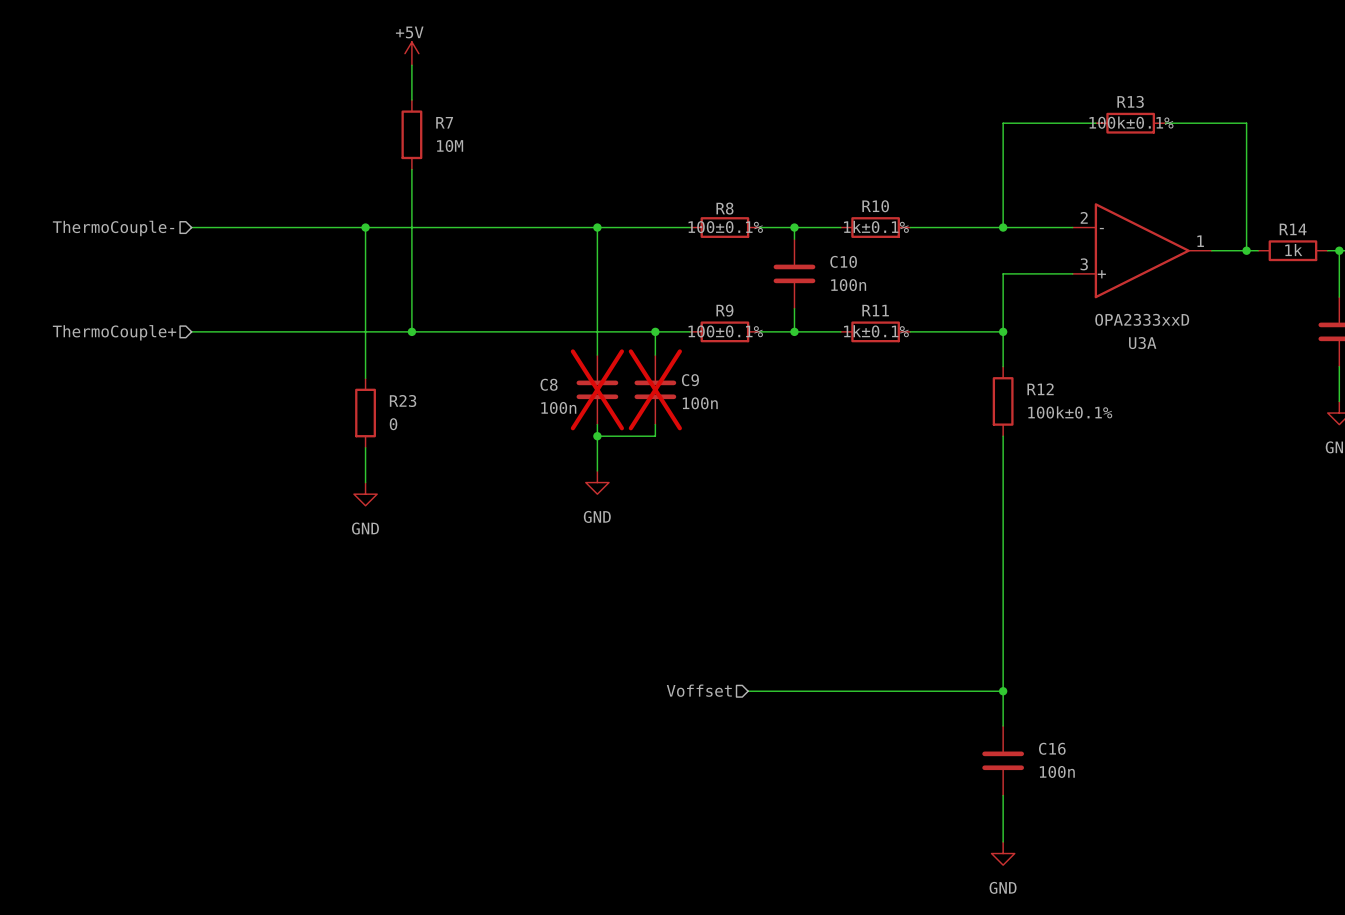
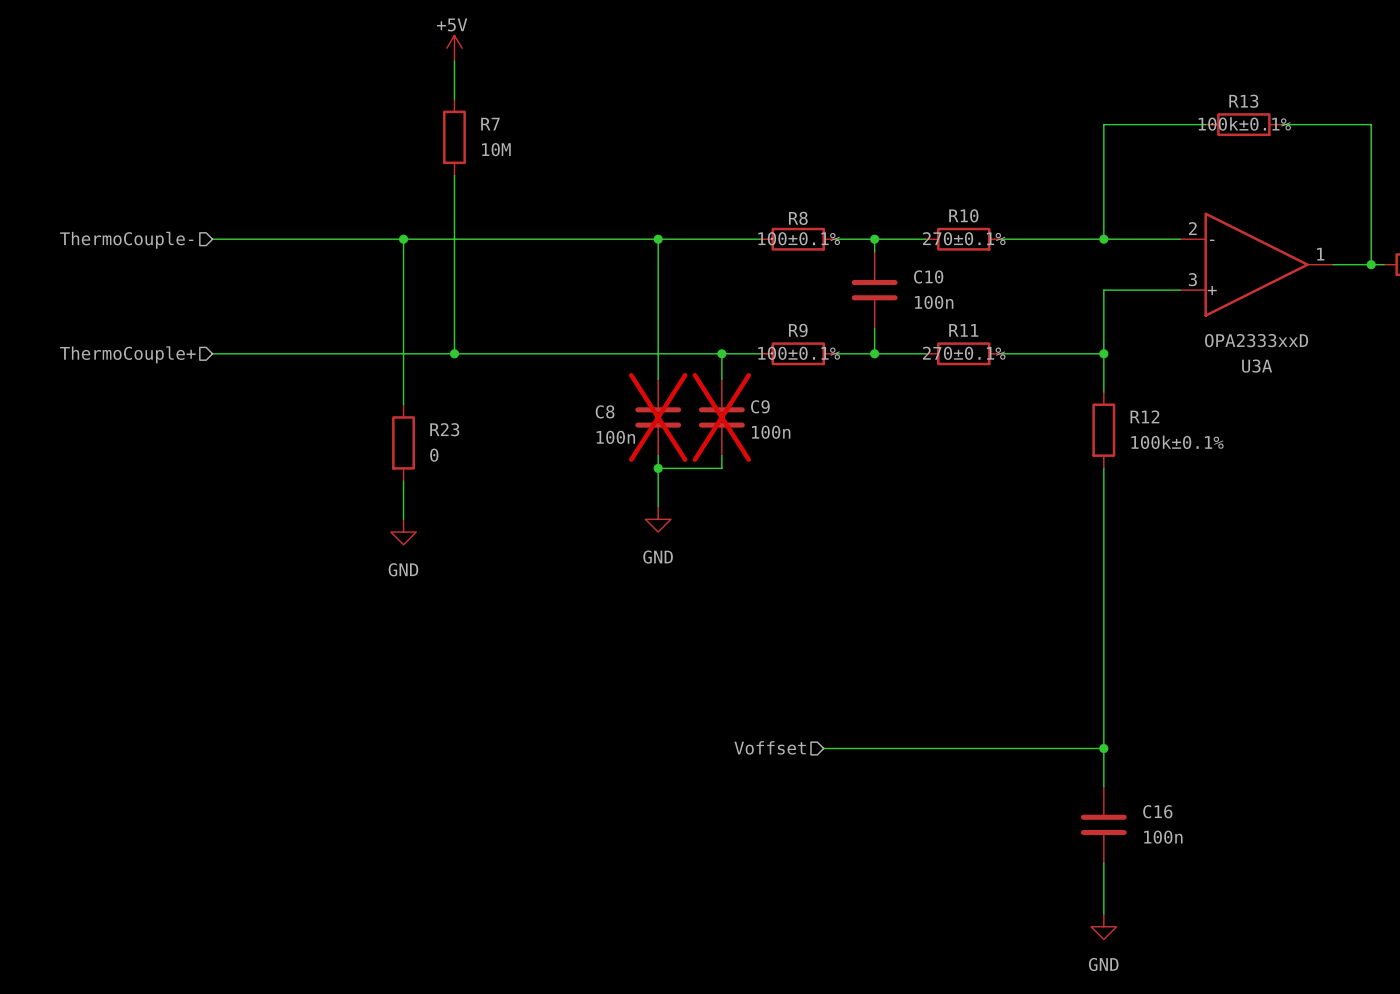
R10 value: 1k±0.1% (876, 226) -> 270±0.1% (964, 238)
R11 value: 1k±0.1% (876, 331) -> 270±0.1% (964, 353)

